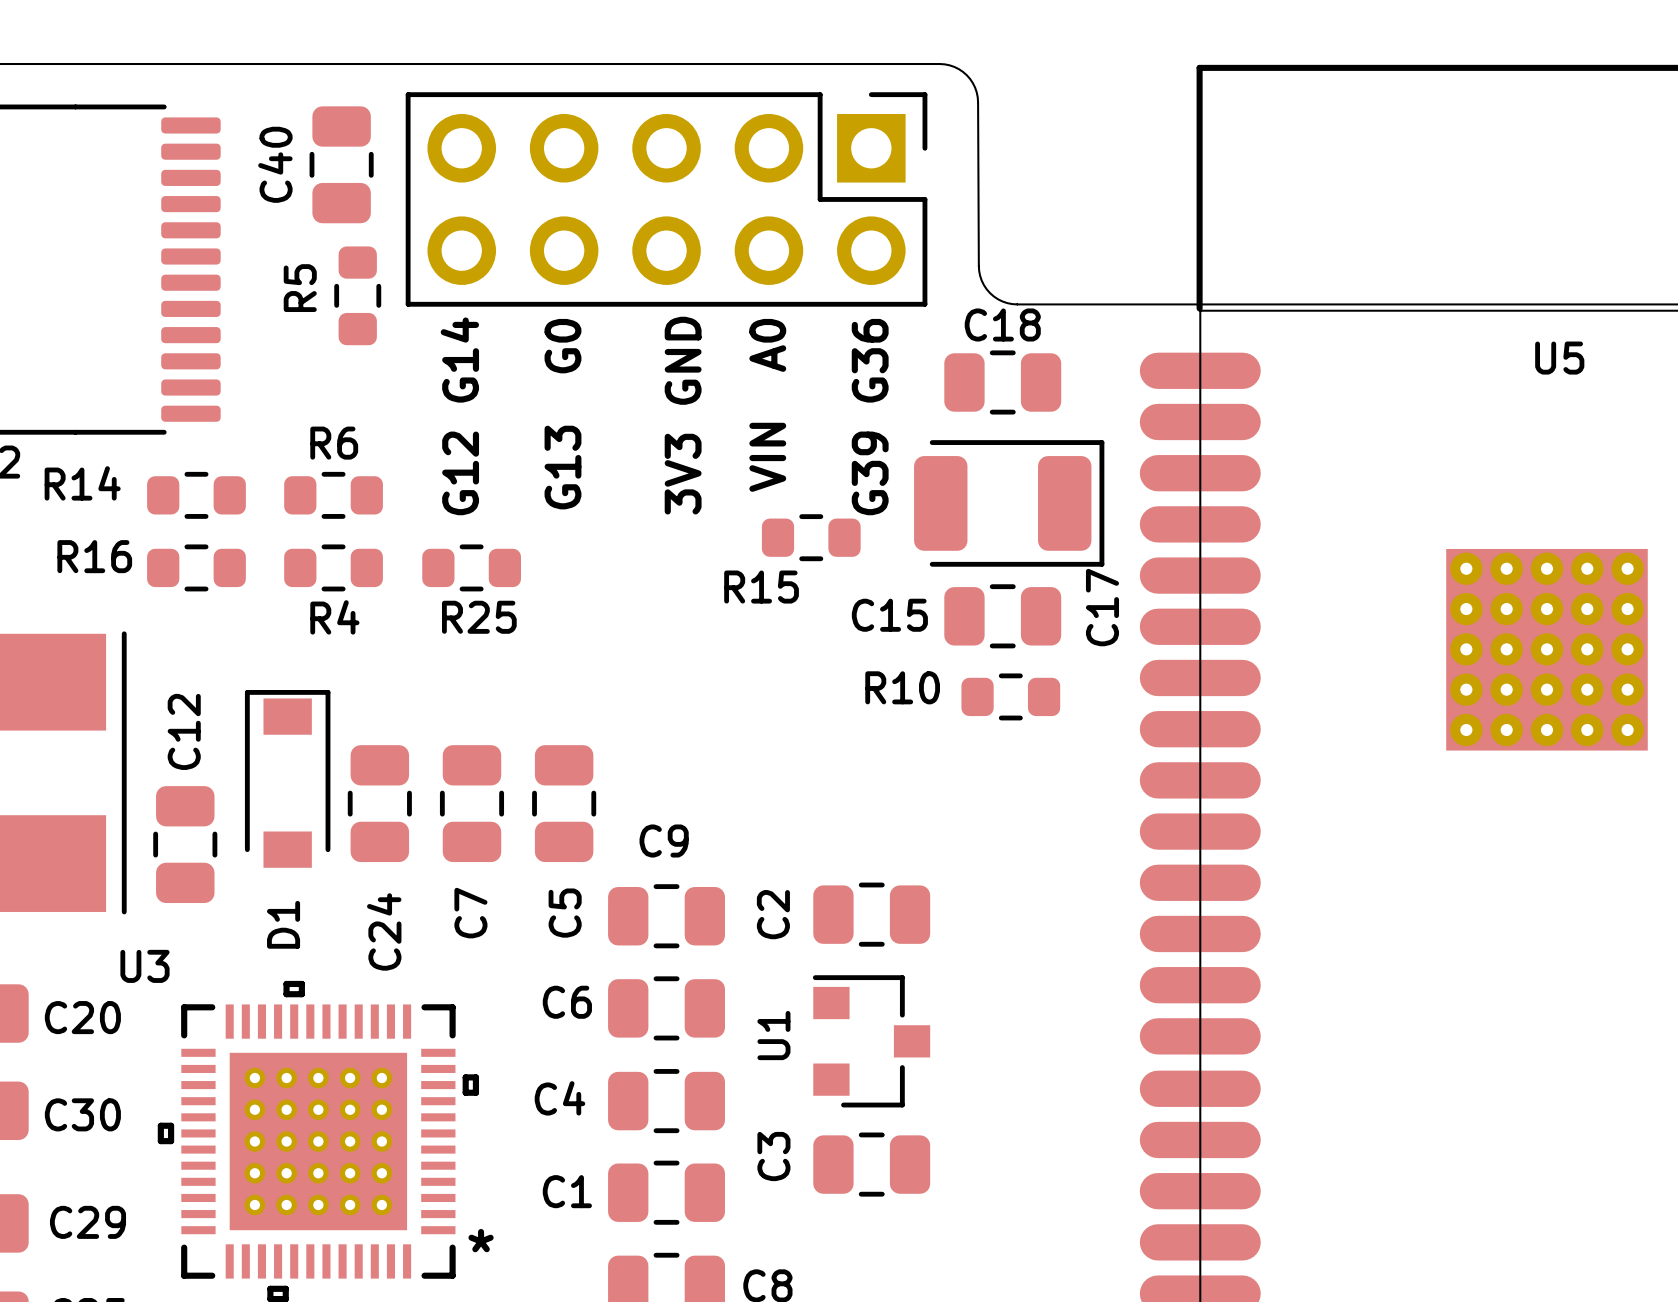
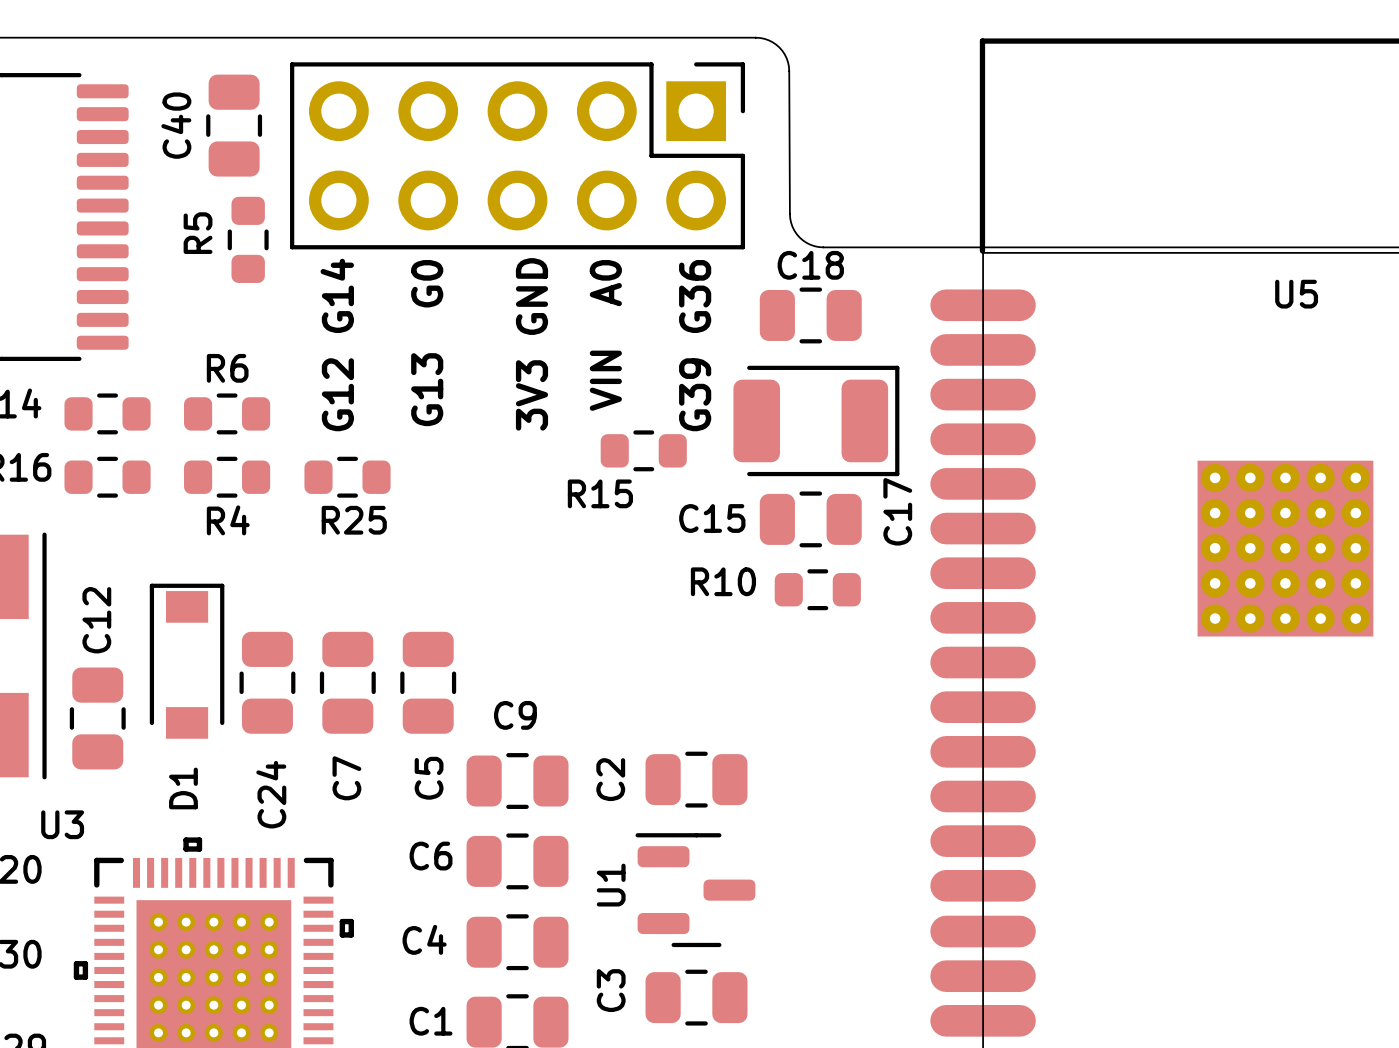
U1 footprint: [812, 975, 931, 1108] -> [635, 833, 756, 948]

